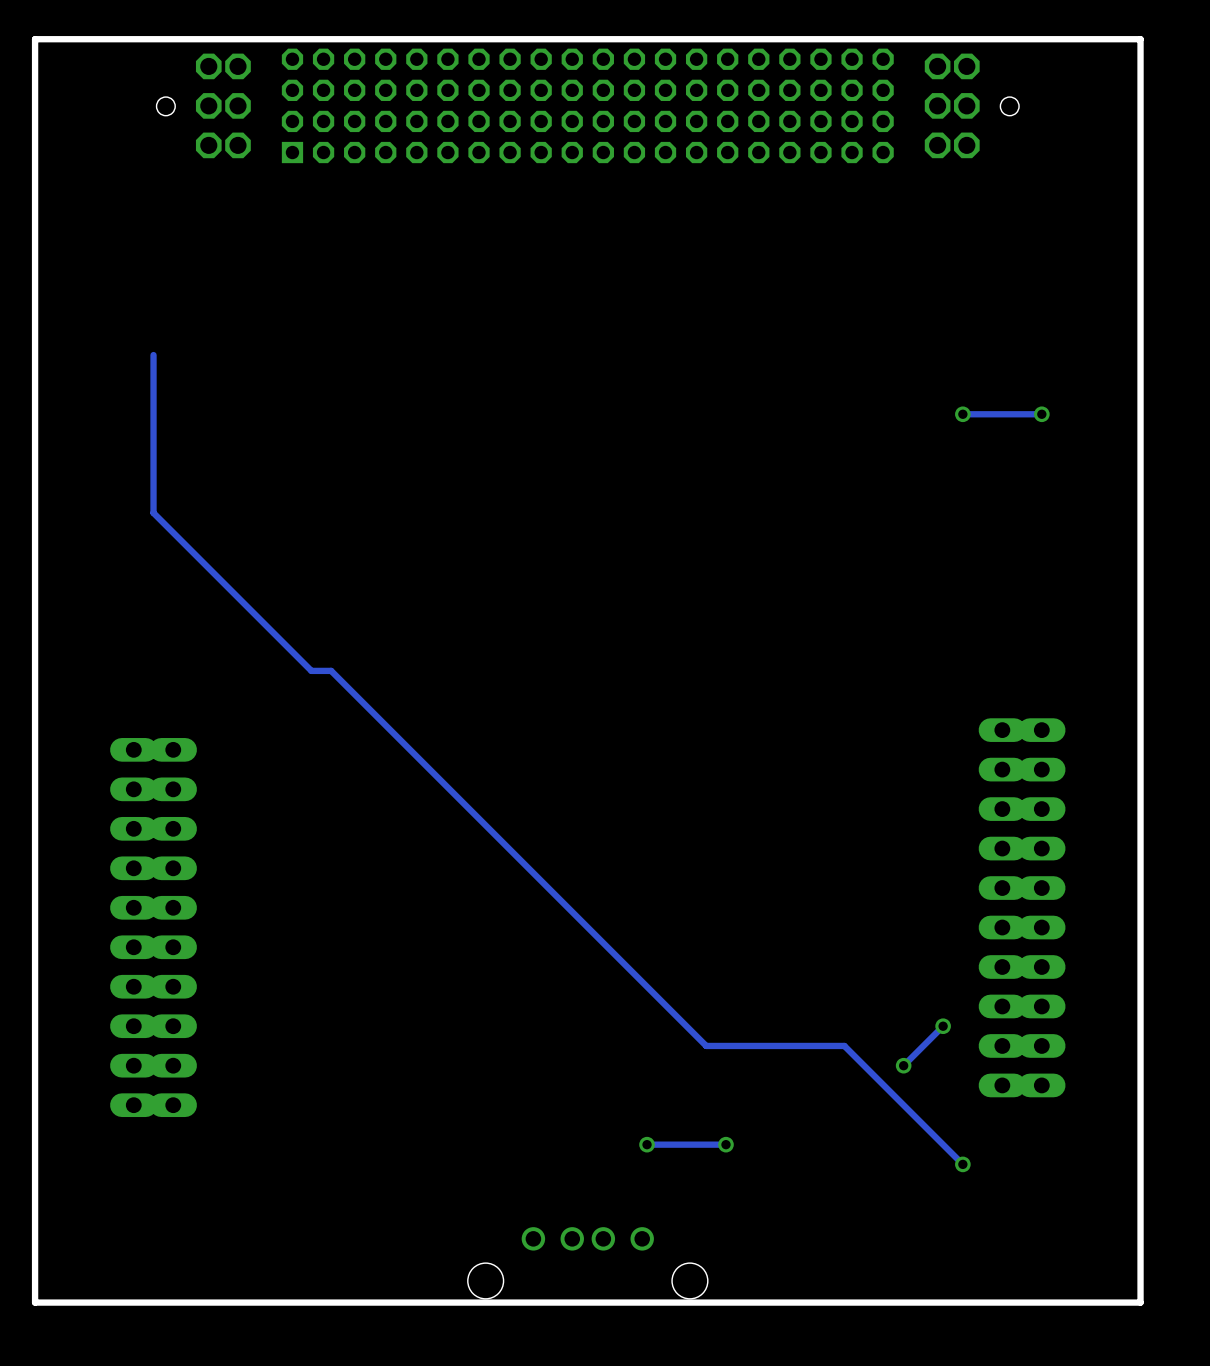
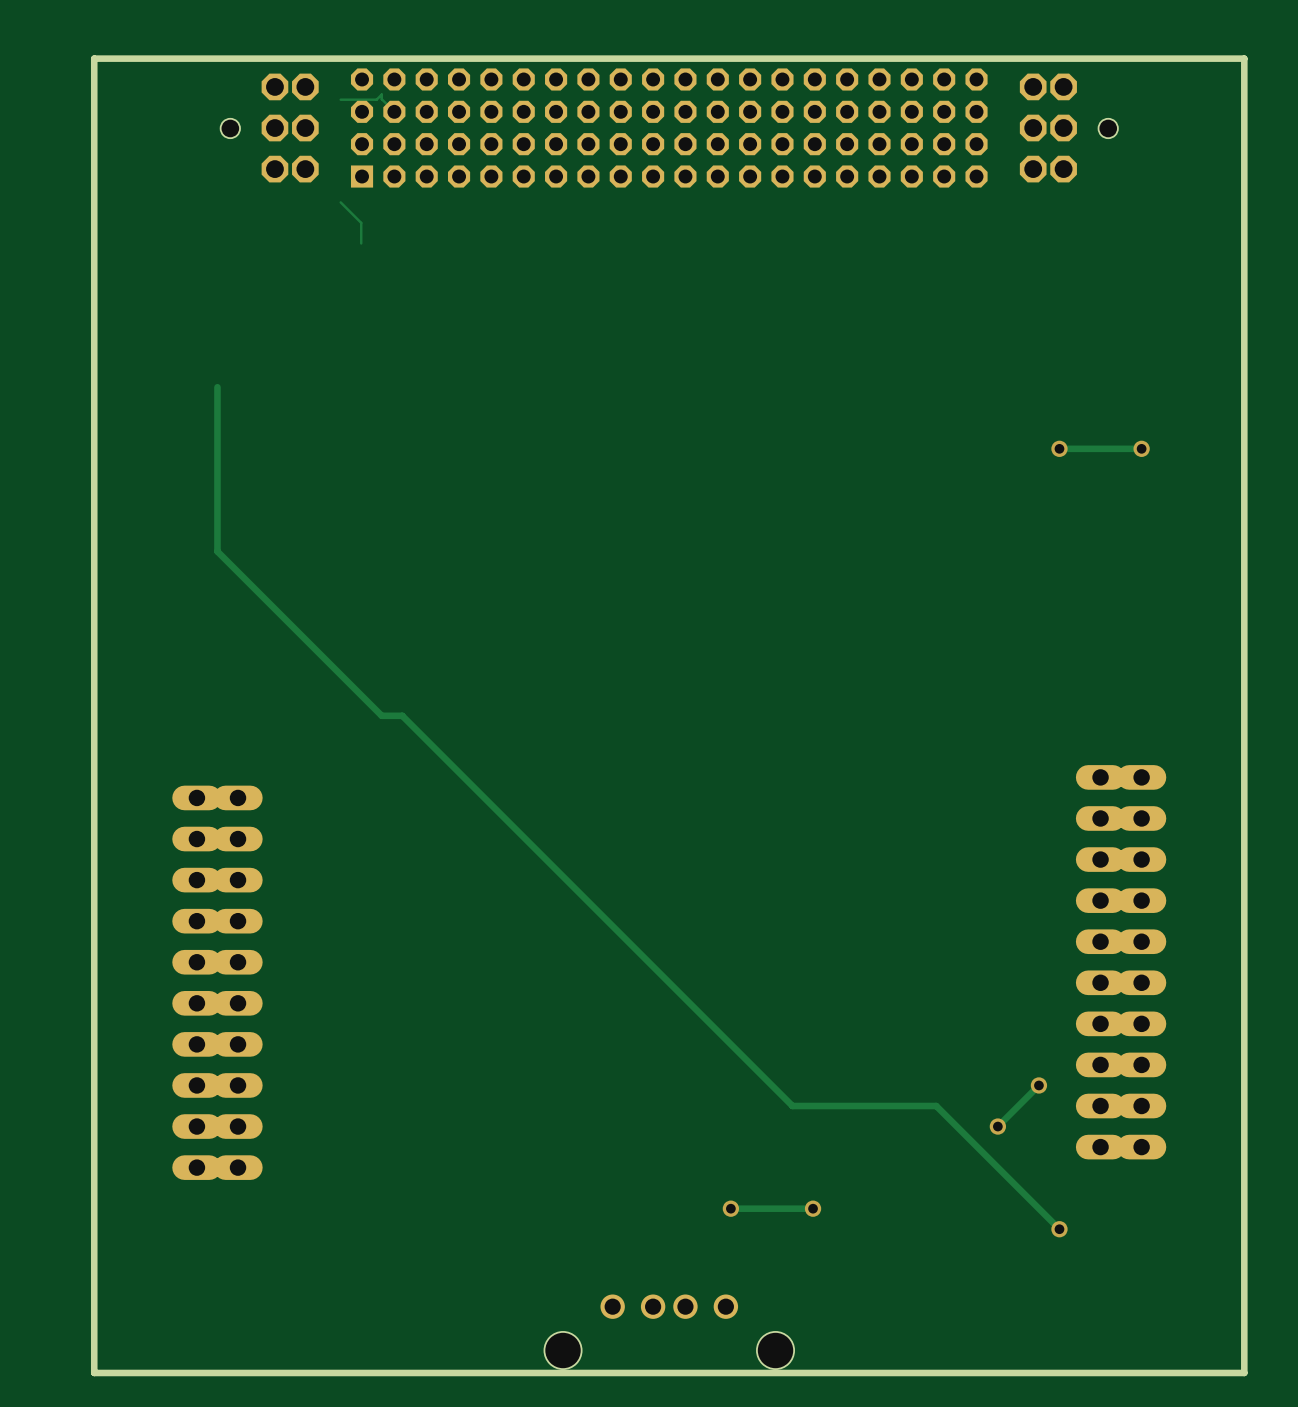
track: none -> (340, 99) (376, 99) (381, 94) (381, 99) (394, 111)
track: none -> (340, 202) (361, 222) (361, 243)

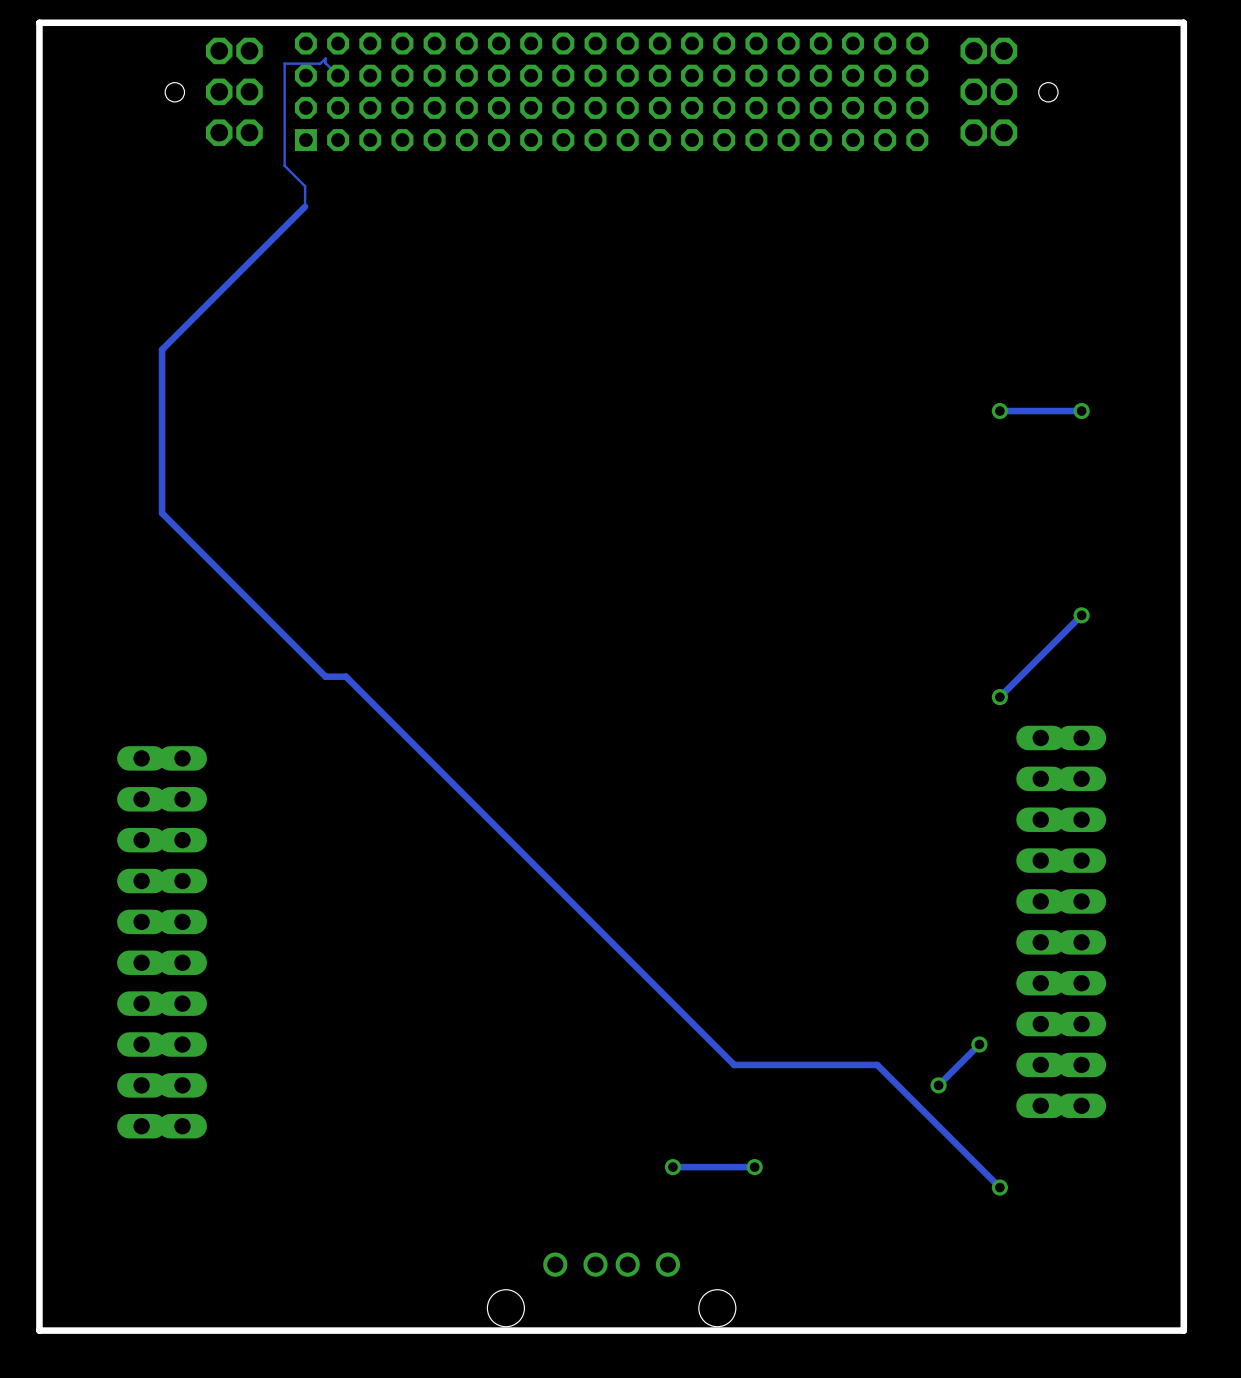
track: none -> (284, 63) (284, 165)
track: none -> (305, 206) (162, 349)
track: none -> (1081, 615) (999, 697)
via: none -> (1081, 615)
via: none -> (999, 697)

